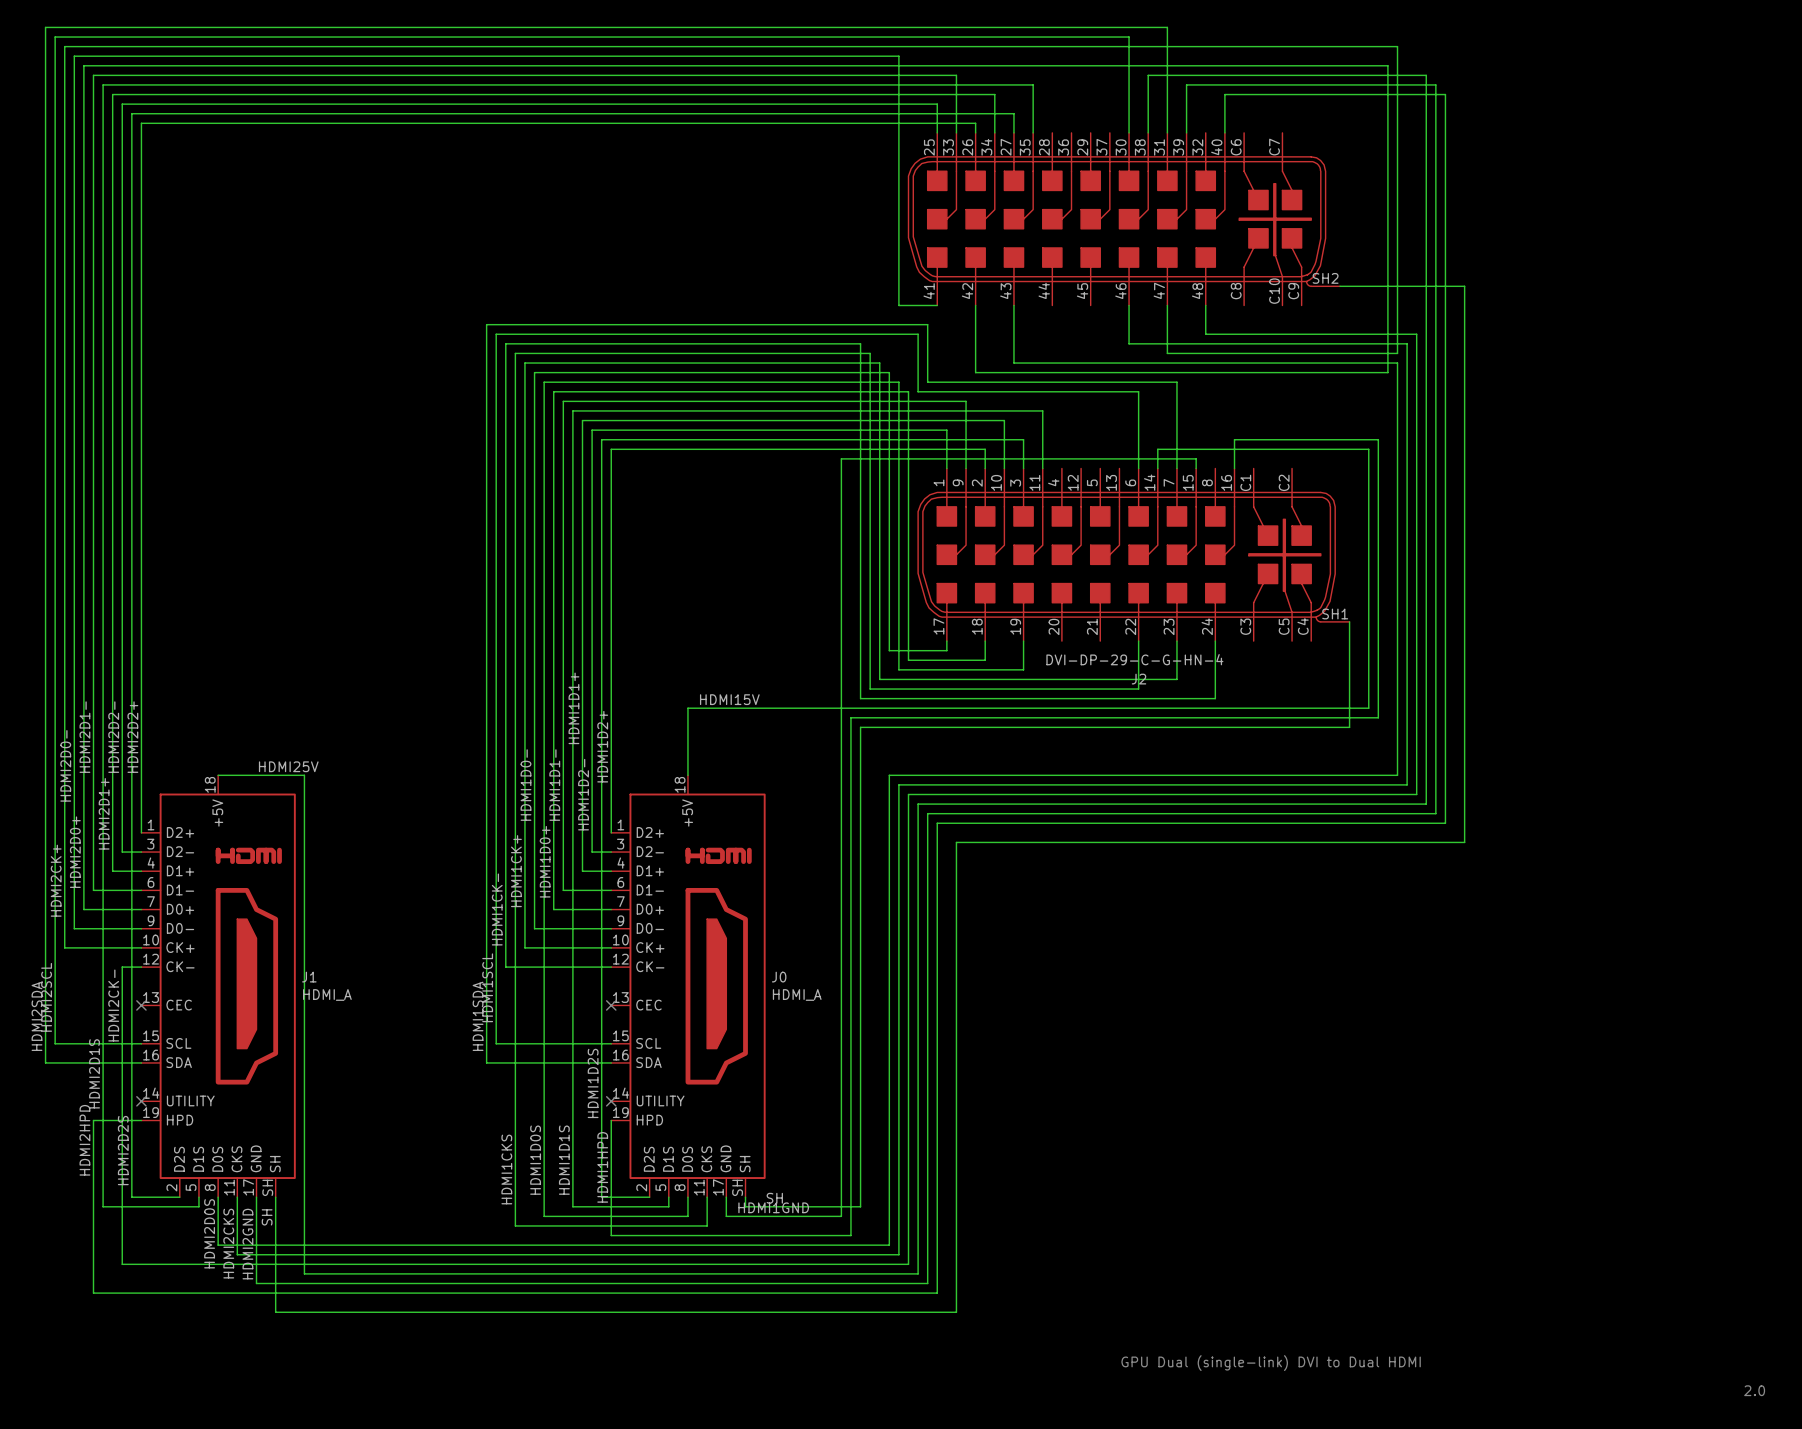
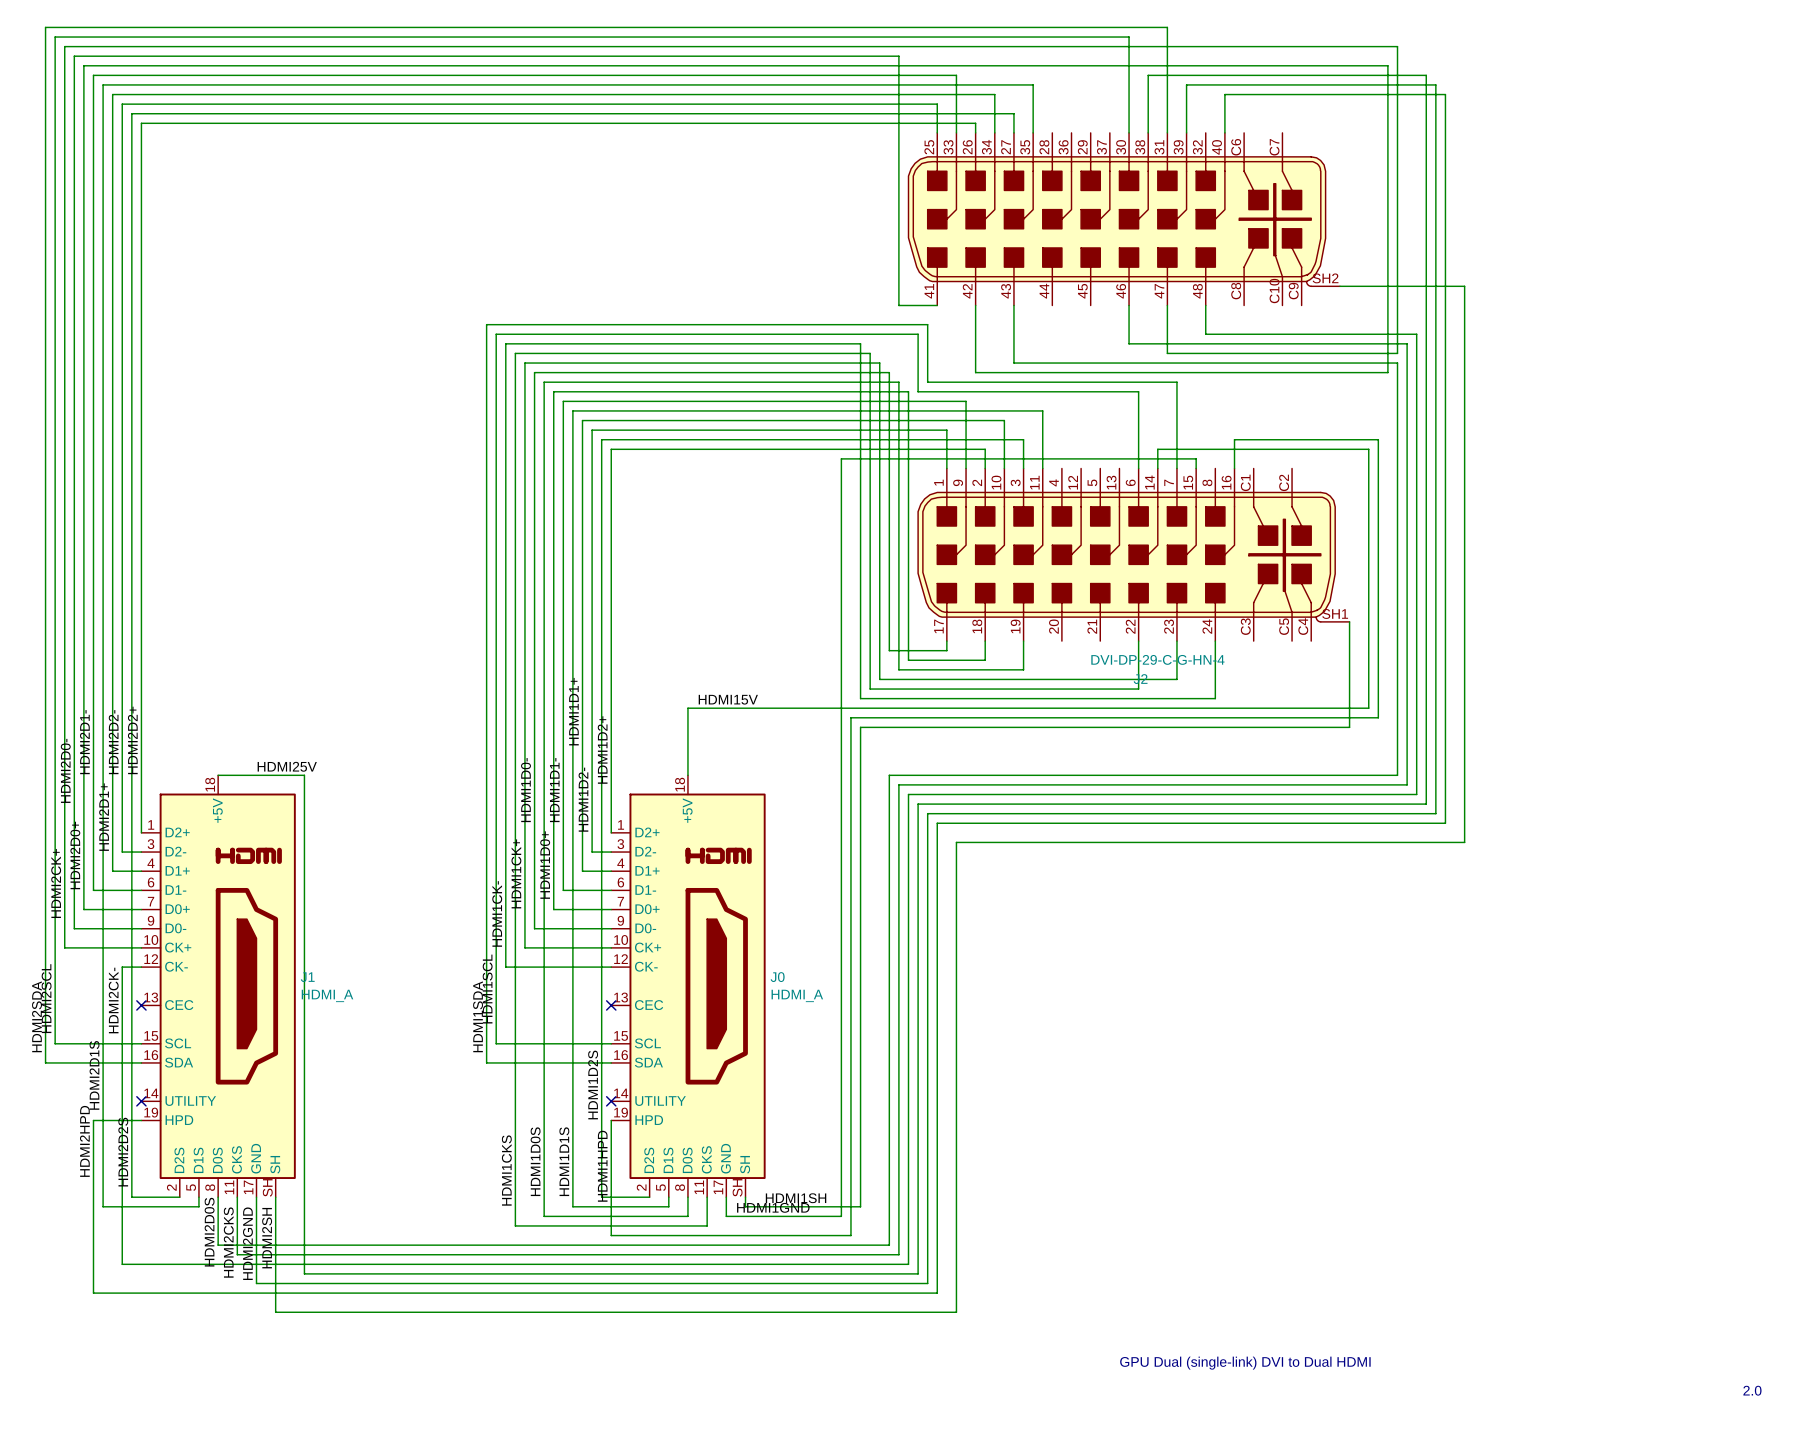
label: SH (774, 1198) -> HDMI1SH (796, 1198)
label: SH (267, 1217) -> HDMI2SH (267, 1238)

